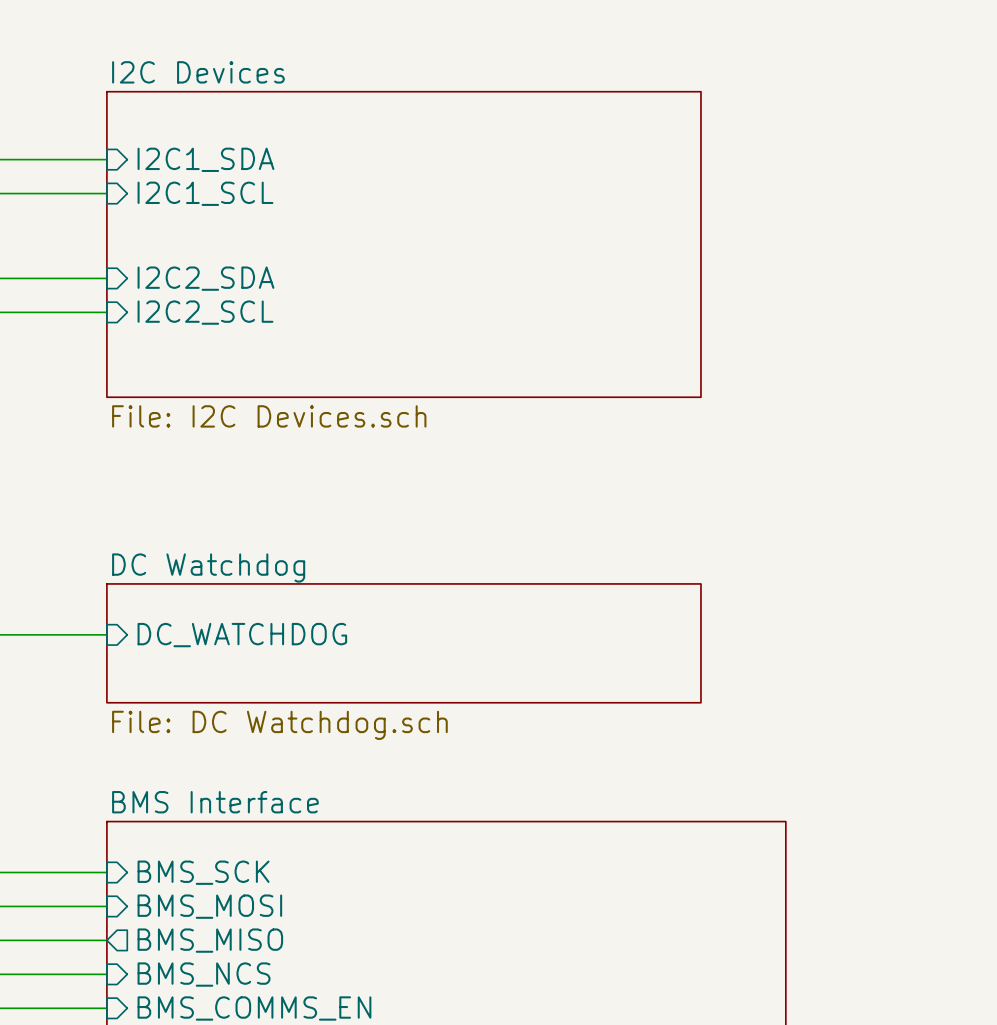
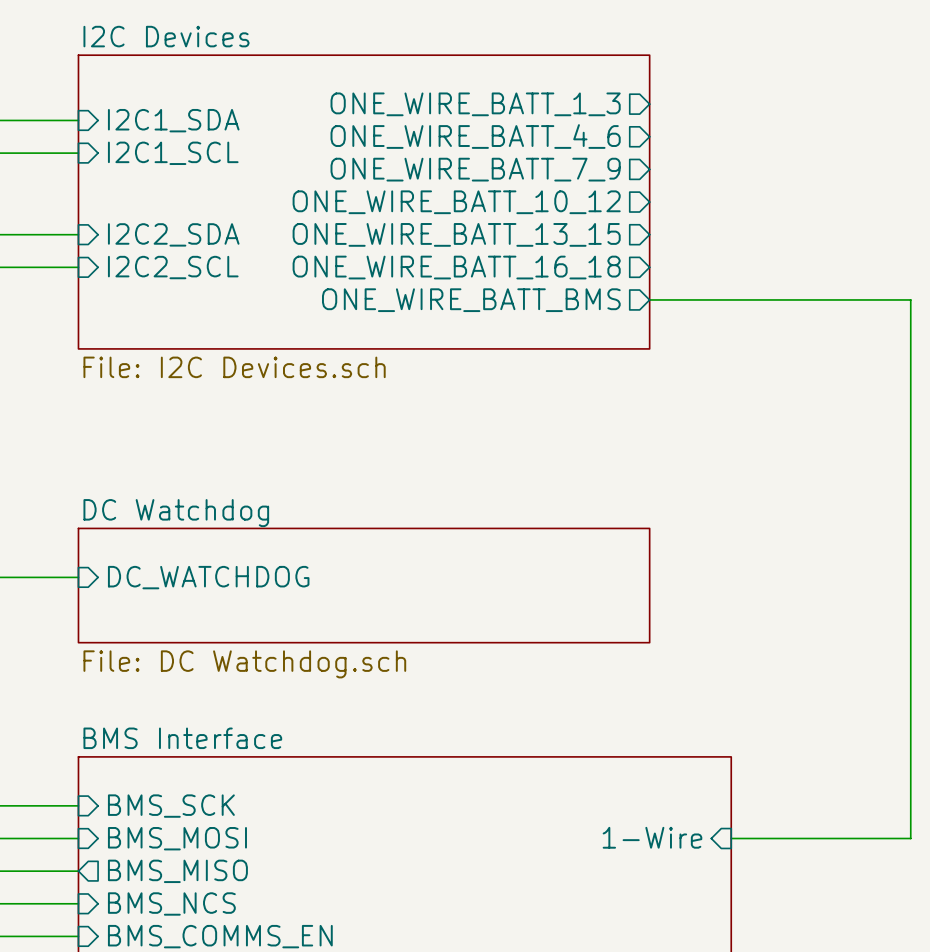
sheet pin: none -> ONE_WIRE_BATT_1_3 (475, 104)
sheet pin: none -> ONE_WIRE_BATT_4_6 (475, 136)
sheet pin: none -> ONE_WIRE_BATT_7_9 (475, 169)
sheet pin: none -> ONE_WIRE_BATT_10_12 (456, 202)
sheet pin: none -> ONE_WIRE_BATT_13_15 (456, 234)
sheet pin: none -> ONE_WIRE_BATT_16_18 (456, 267)
sheet pin: none -> ONE_WIRE_BATT_BMS (471, 300)
wire: none -> (649, 299) (910, 299) (910, 838) (731, 838)
sheet pin: none -> 1-Wire (652, 837)

